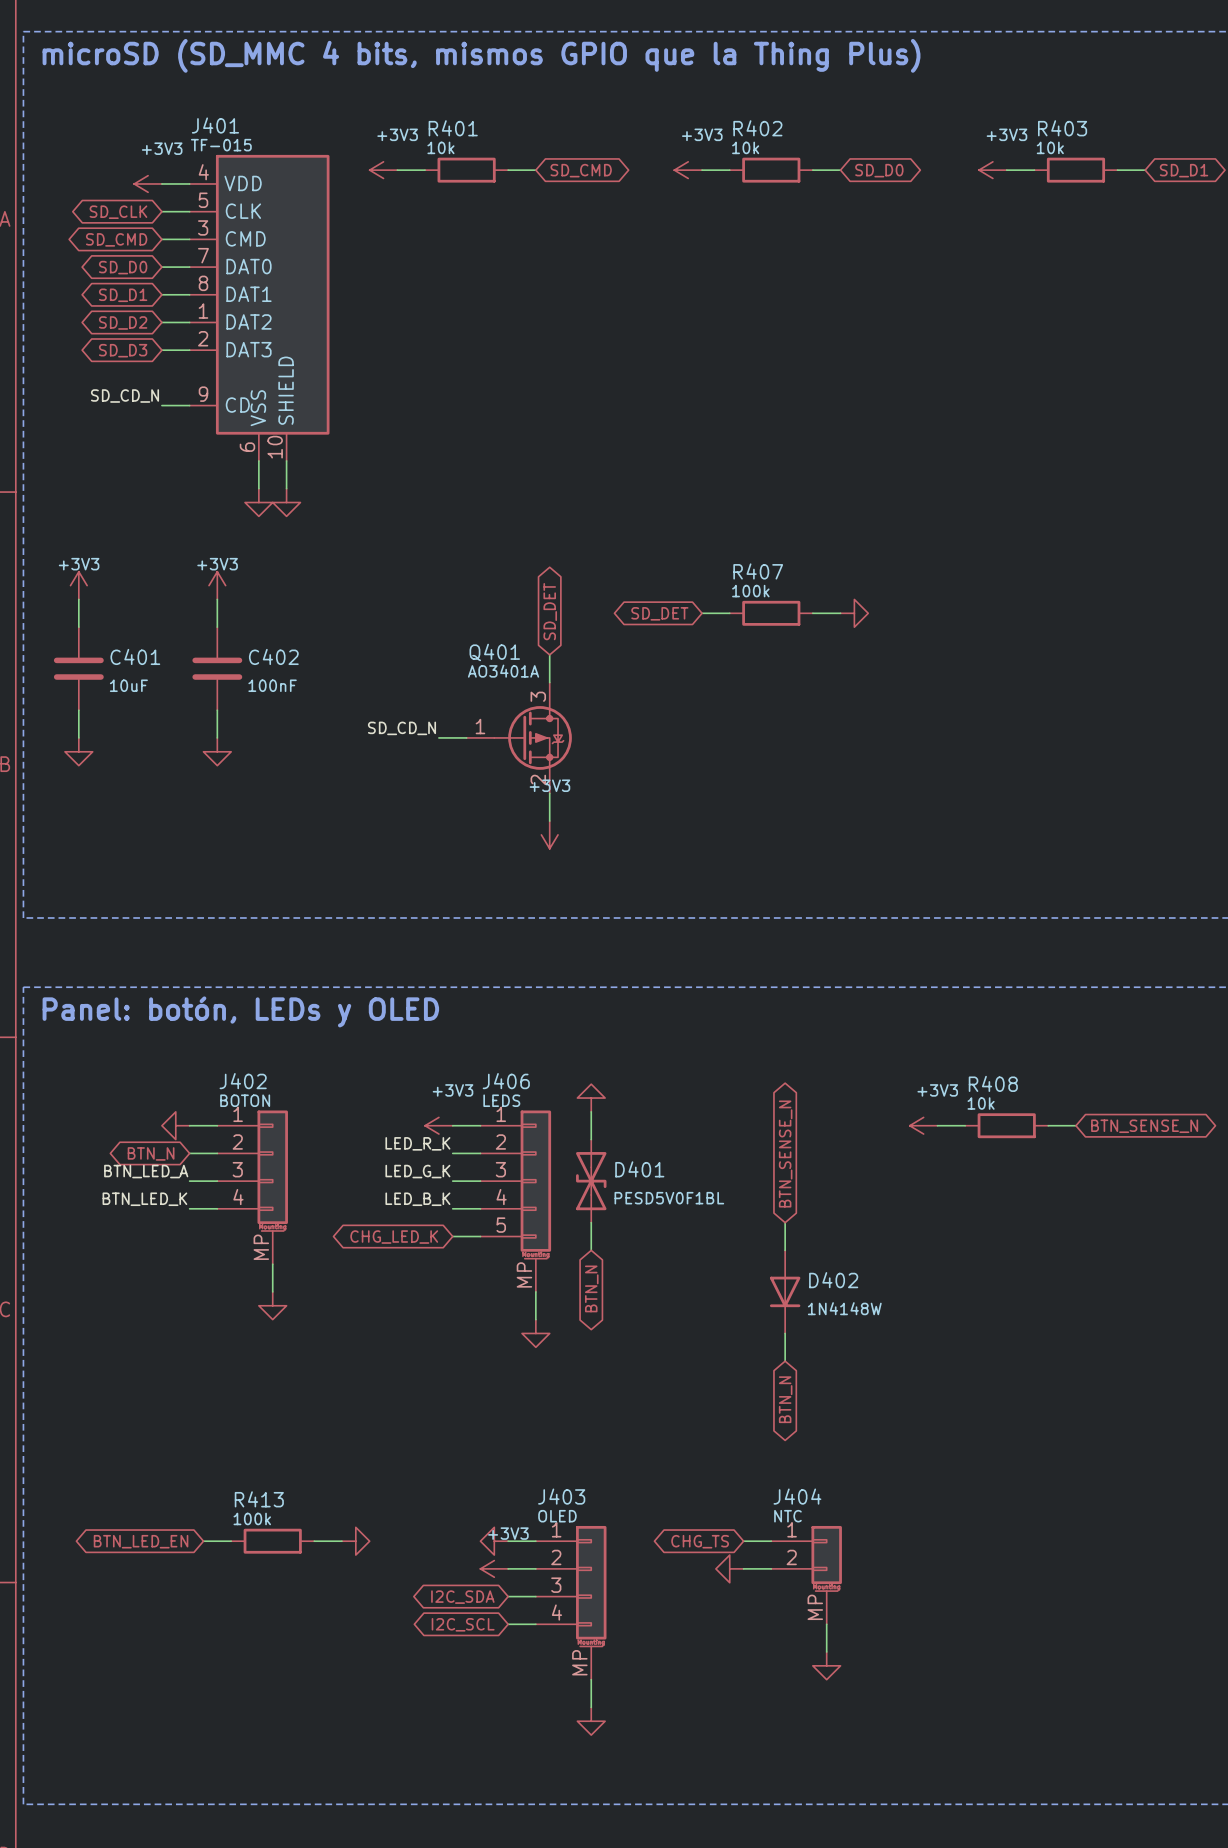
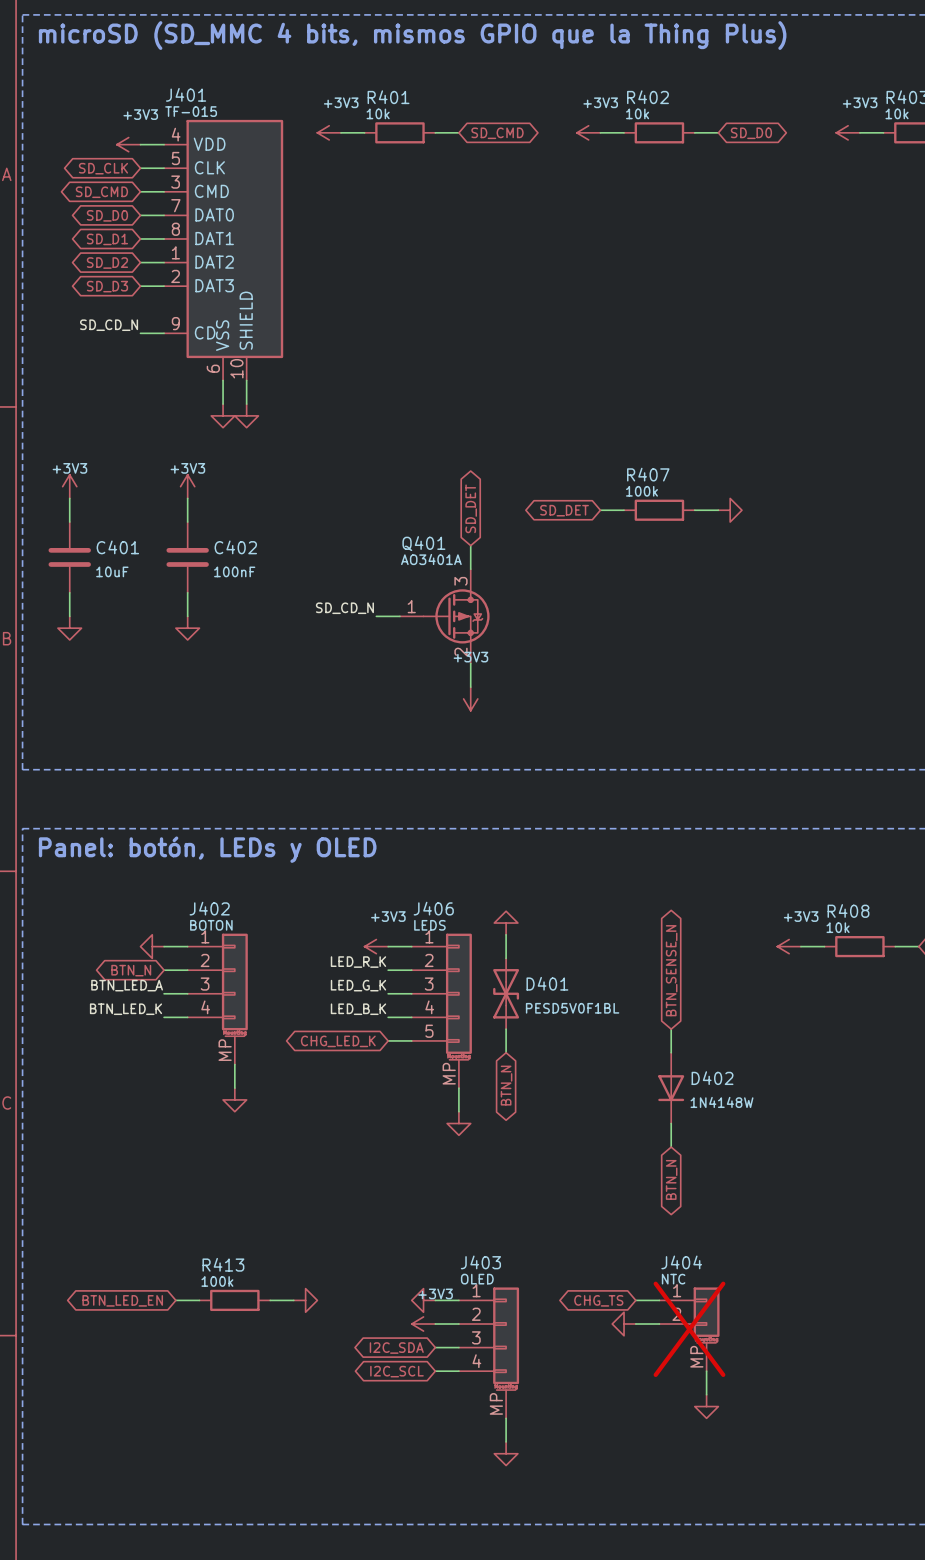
J404 do-not-place cross: none -> (689, 1329)

